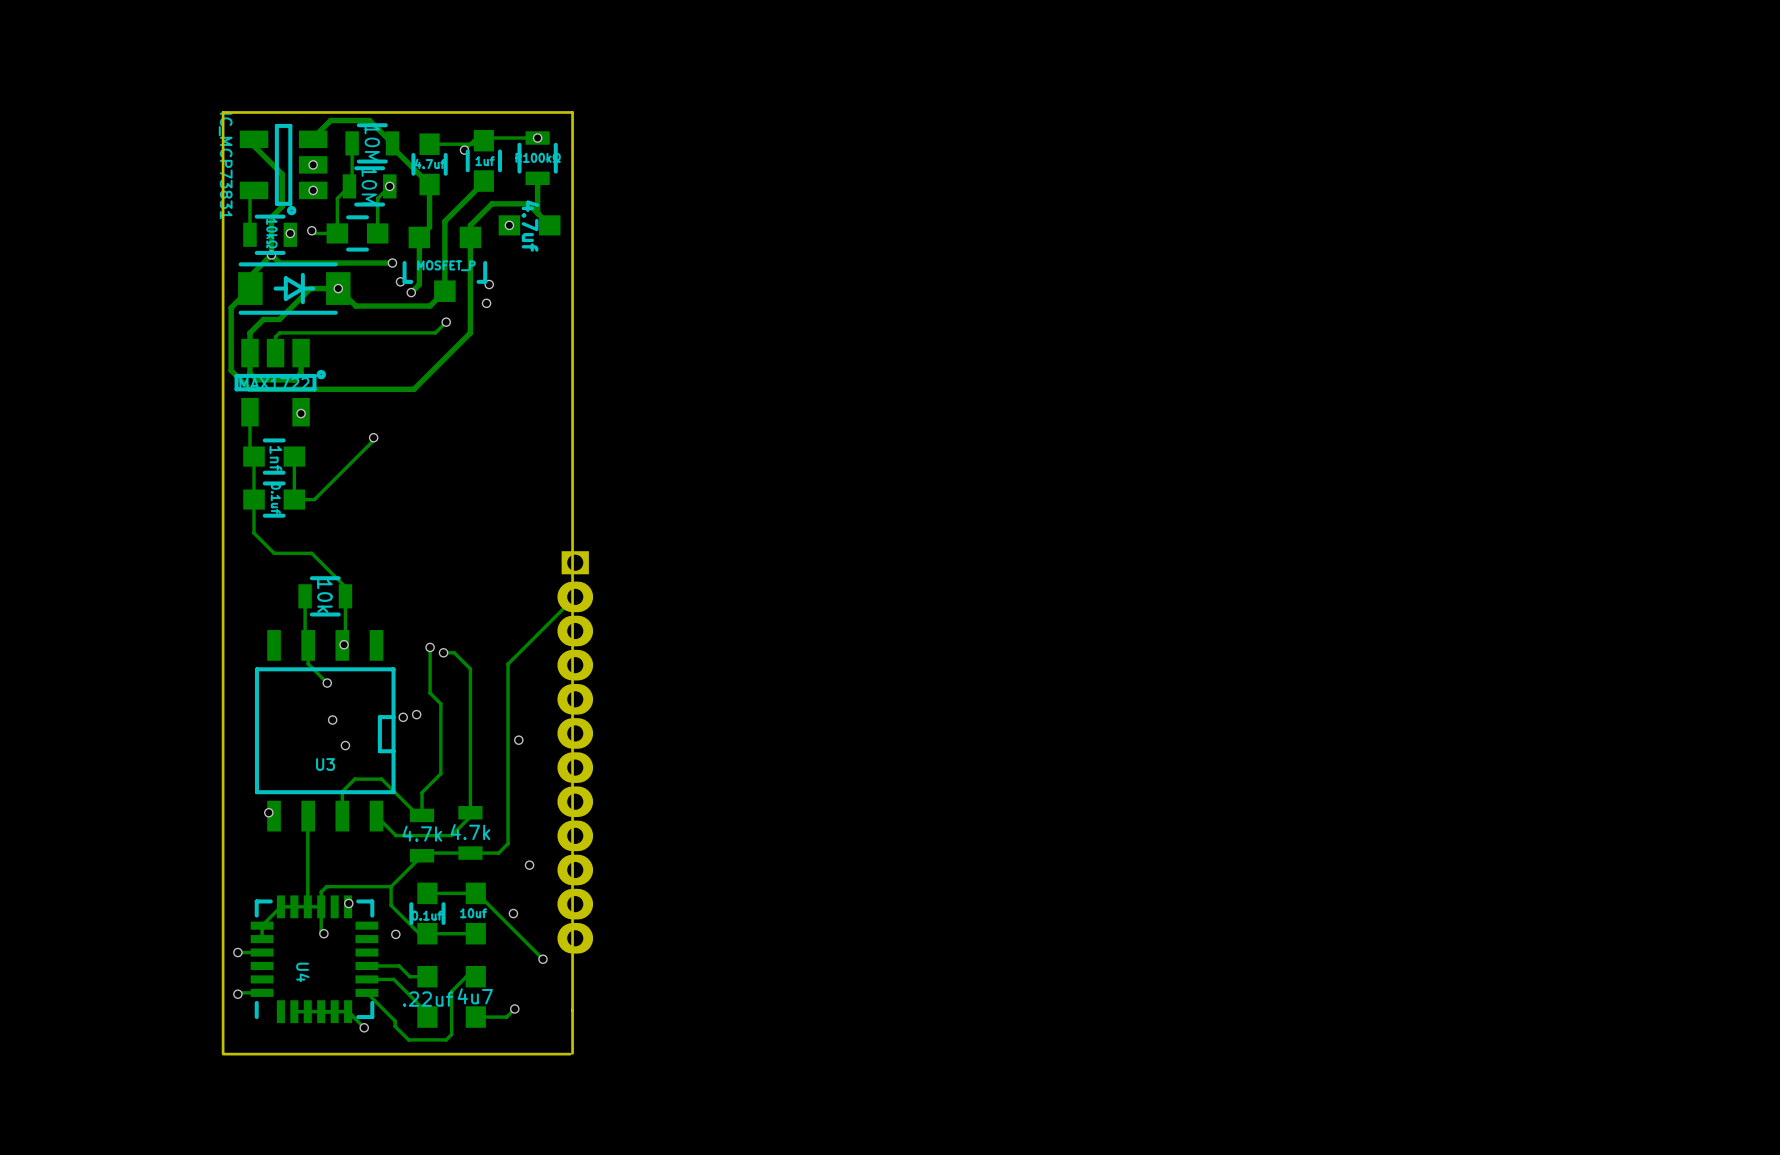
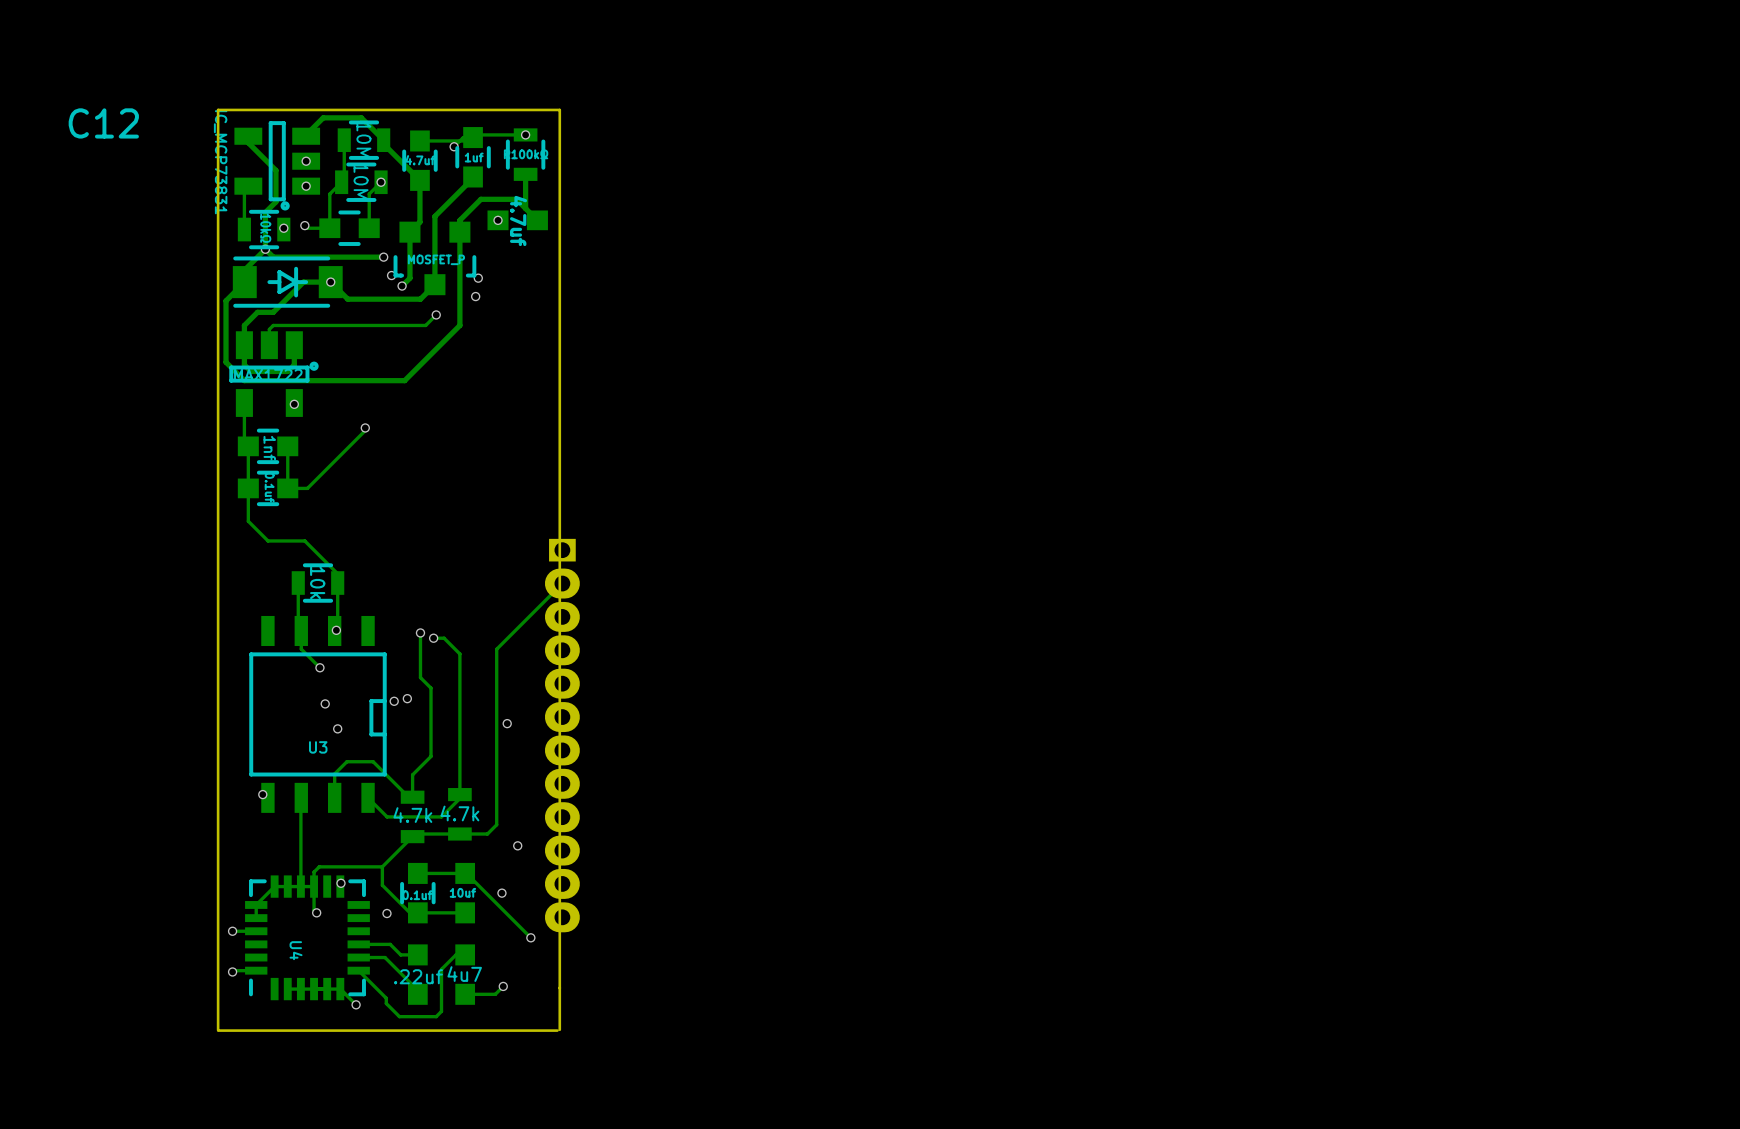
C12 name: none -> C12 (103, 123)

